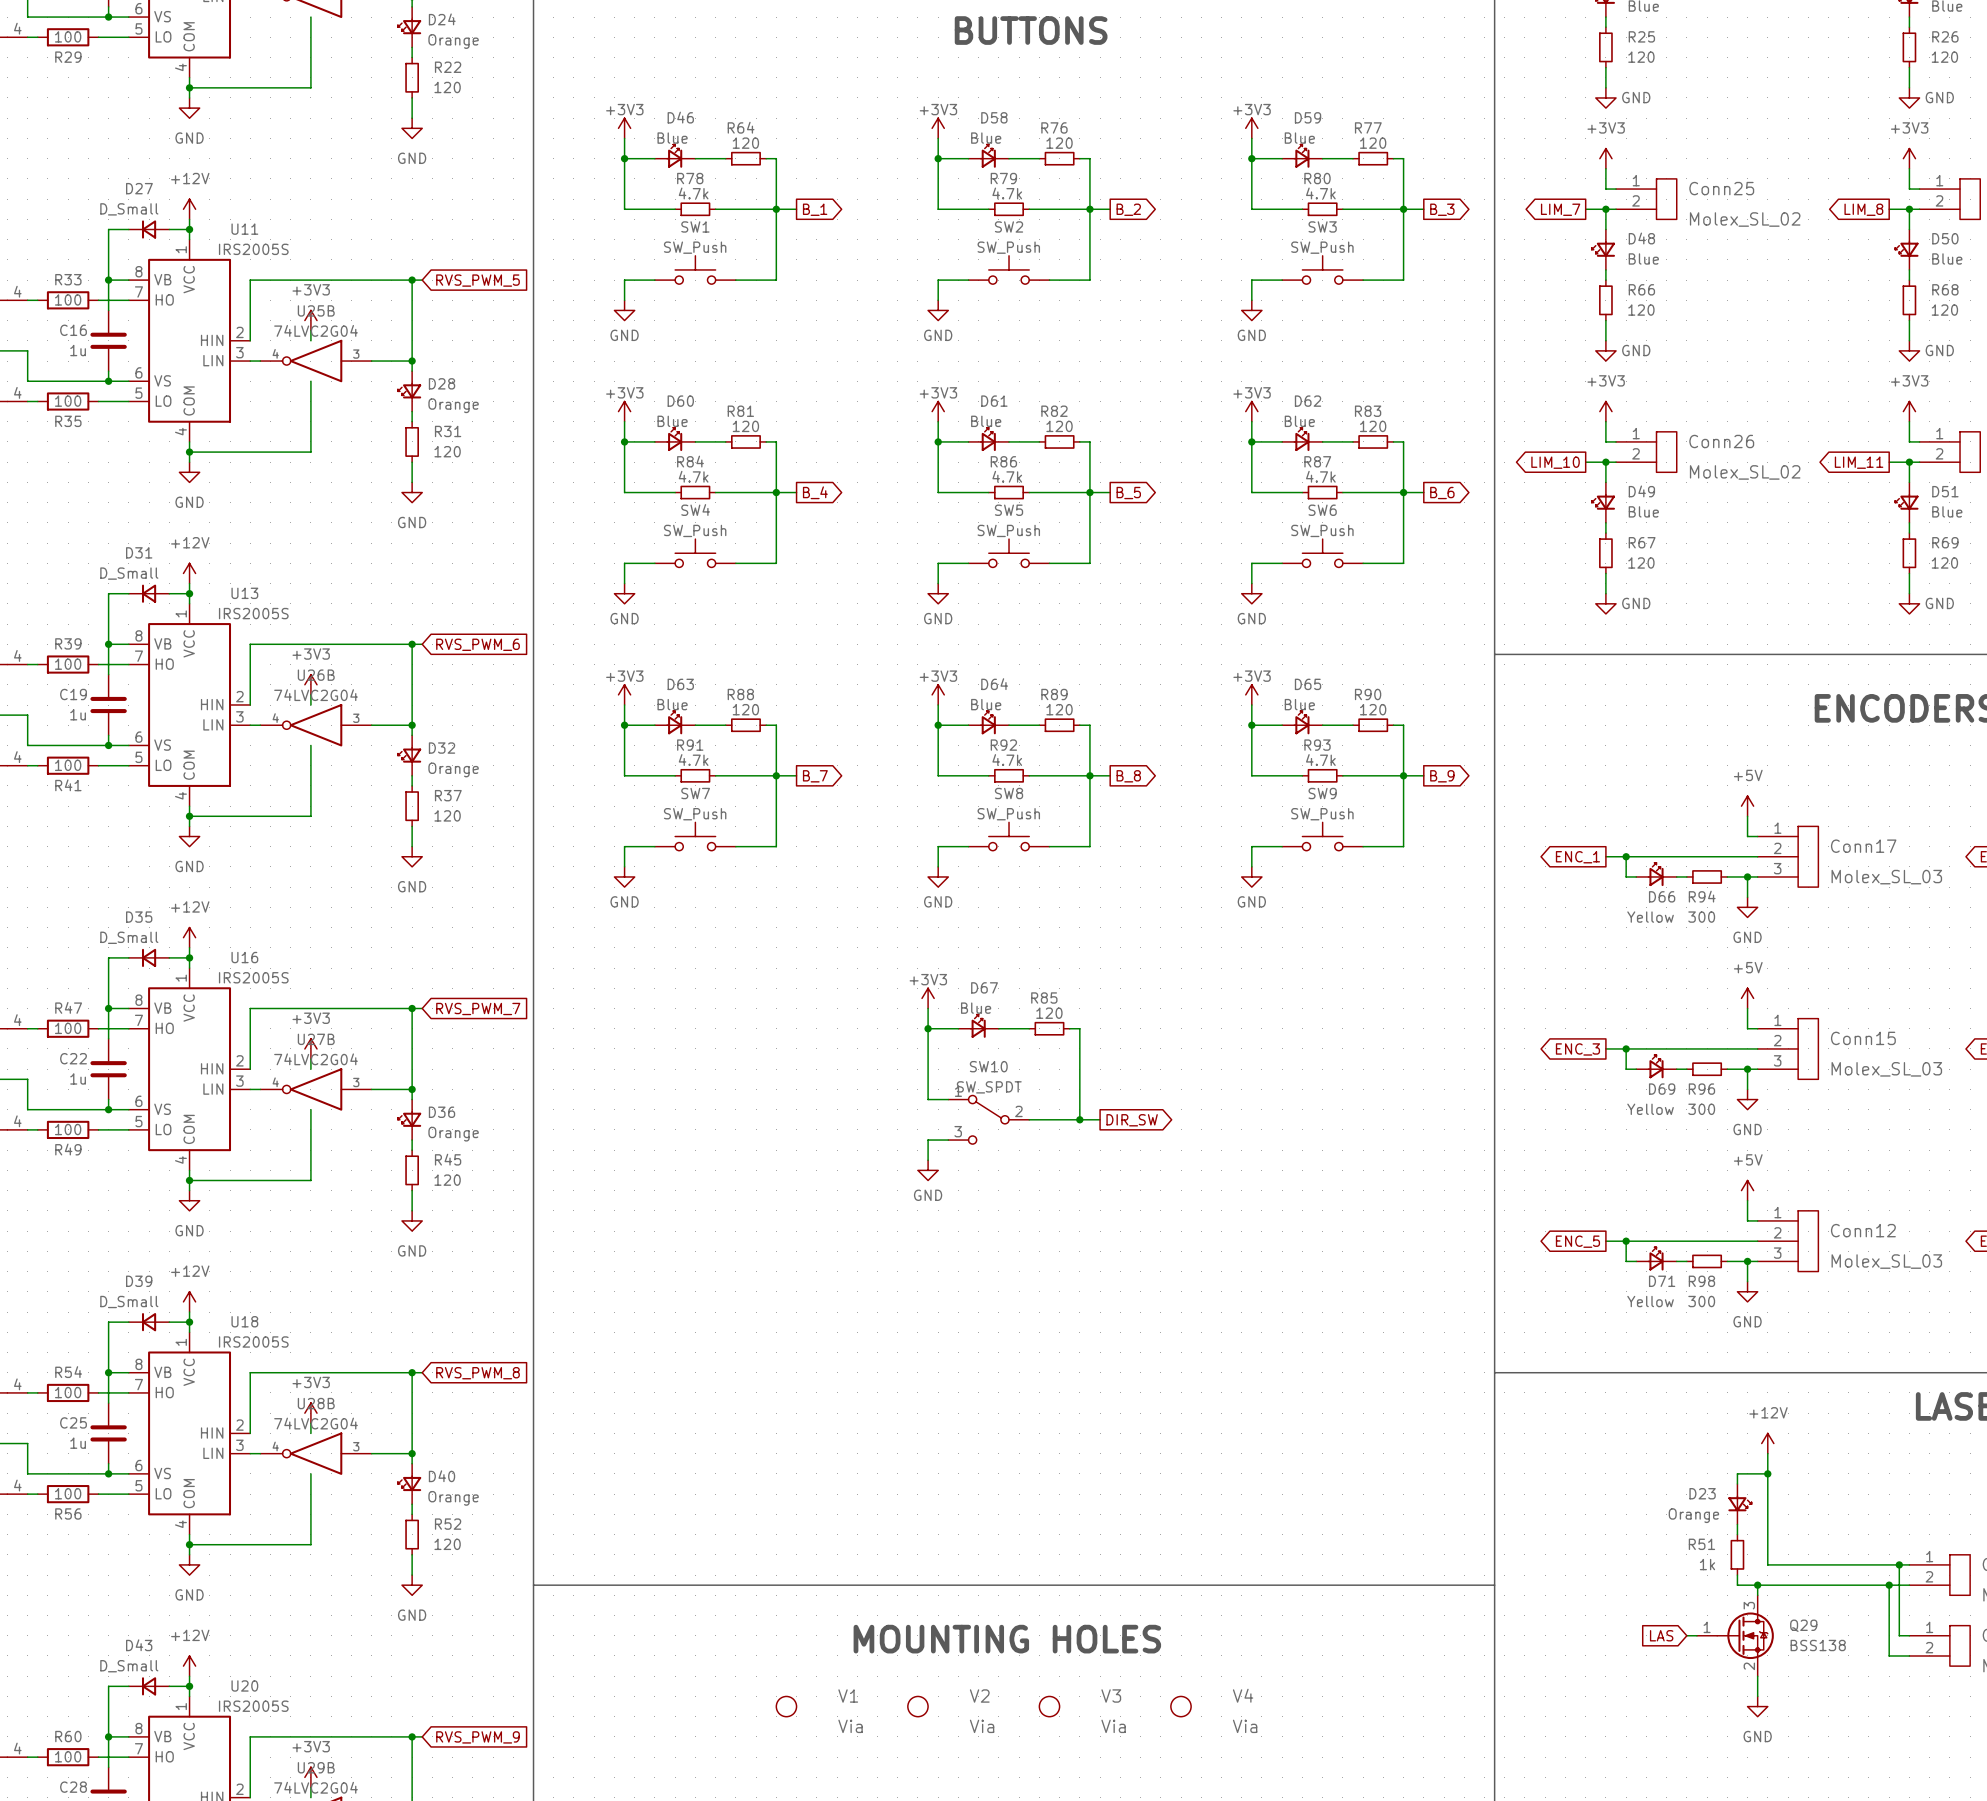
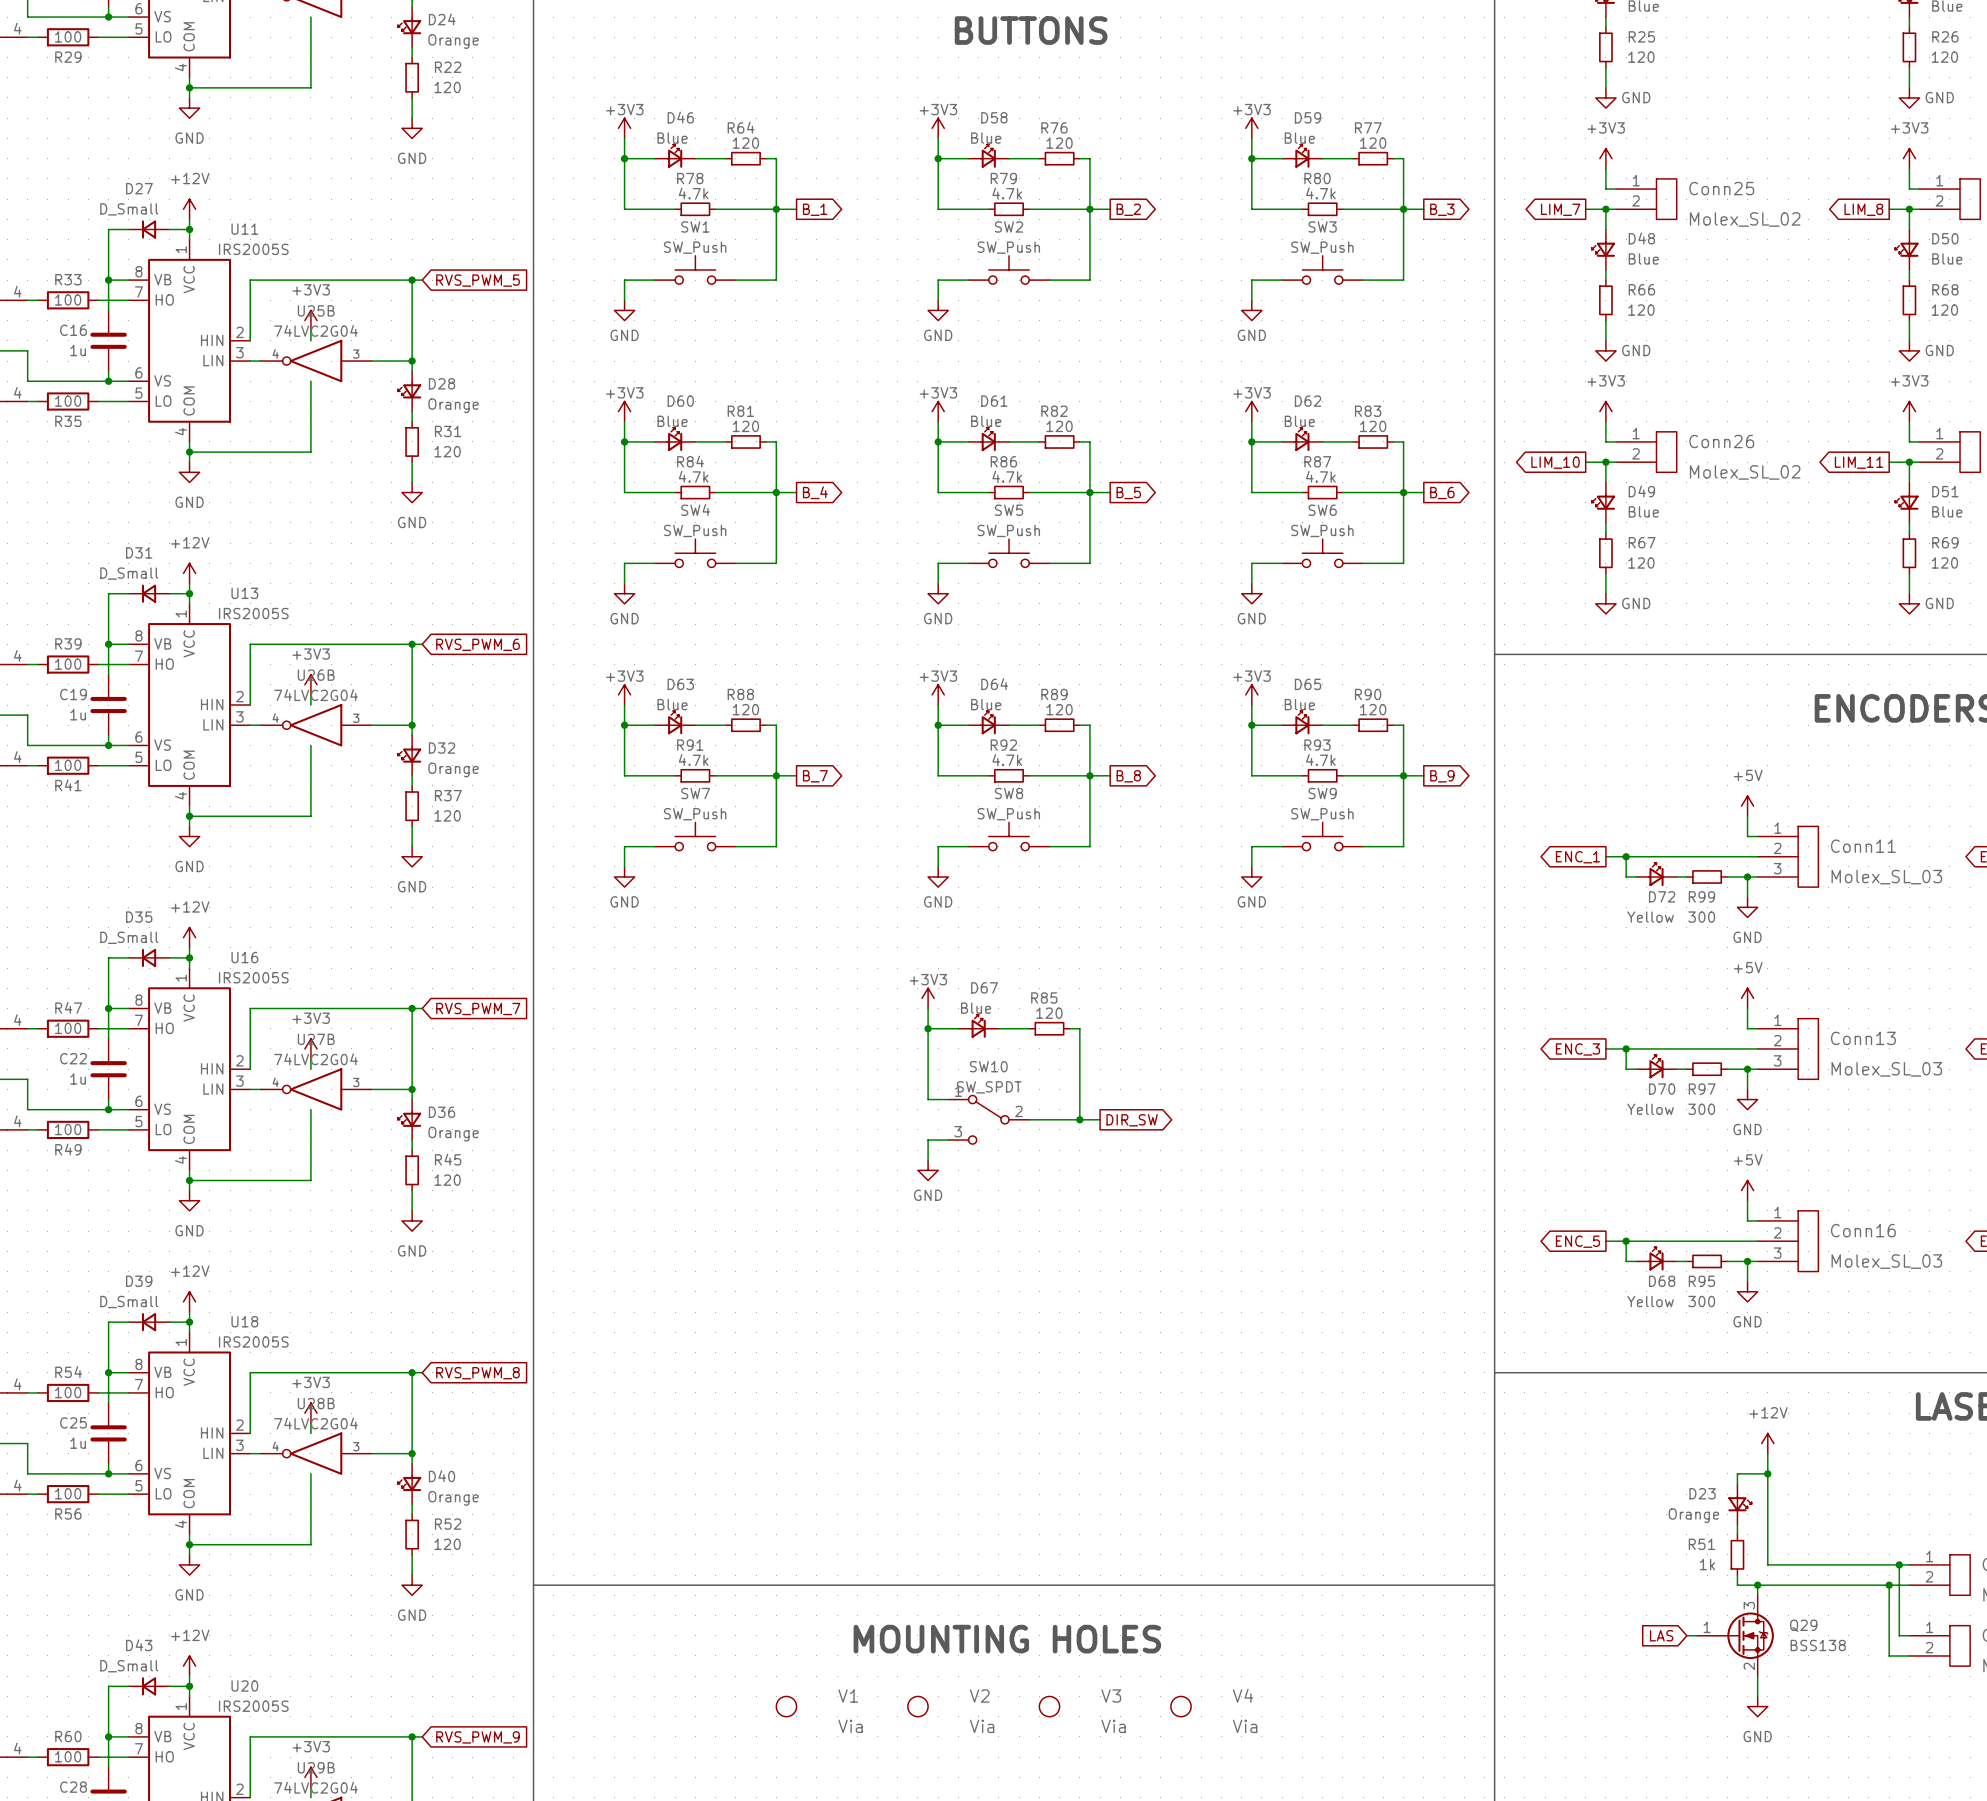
Conn17 name: Conn17 (1863, 846) -> Conn11 (1863, 846)
D66 name: D66 (1662, 896) -> D72 (1662, 896)
R94 name: R94 (1702, 896) -> R99 (1701, 896)
Conn15 name: Conn15 (1863, 1038) -> Conn13 (1863, 1038)
D69 name: D69 (1662, 1089) -> D70 (1662, 1089)
R96 name: R96 (1701, 1089) -> R97 (1702, 1089)
Conn12 name: Conn12 (1863, 1230) -> Conn16 (1863, 1230)
D71 name: D71 (1662, 1281) -> D68 (1662, 1281)
R98 name: R98 (1701, 1281) -> R95 (1701, 1281)

